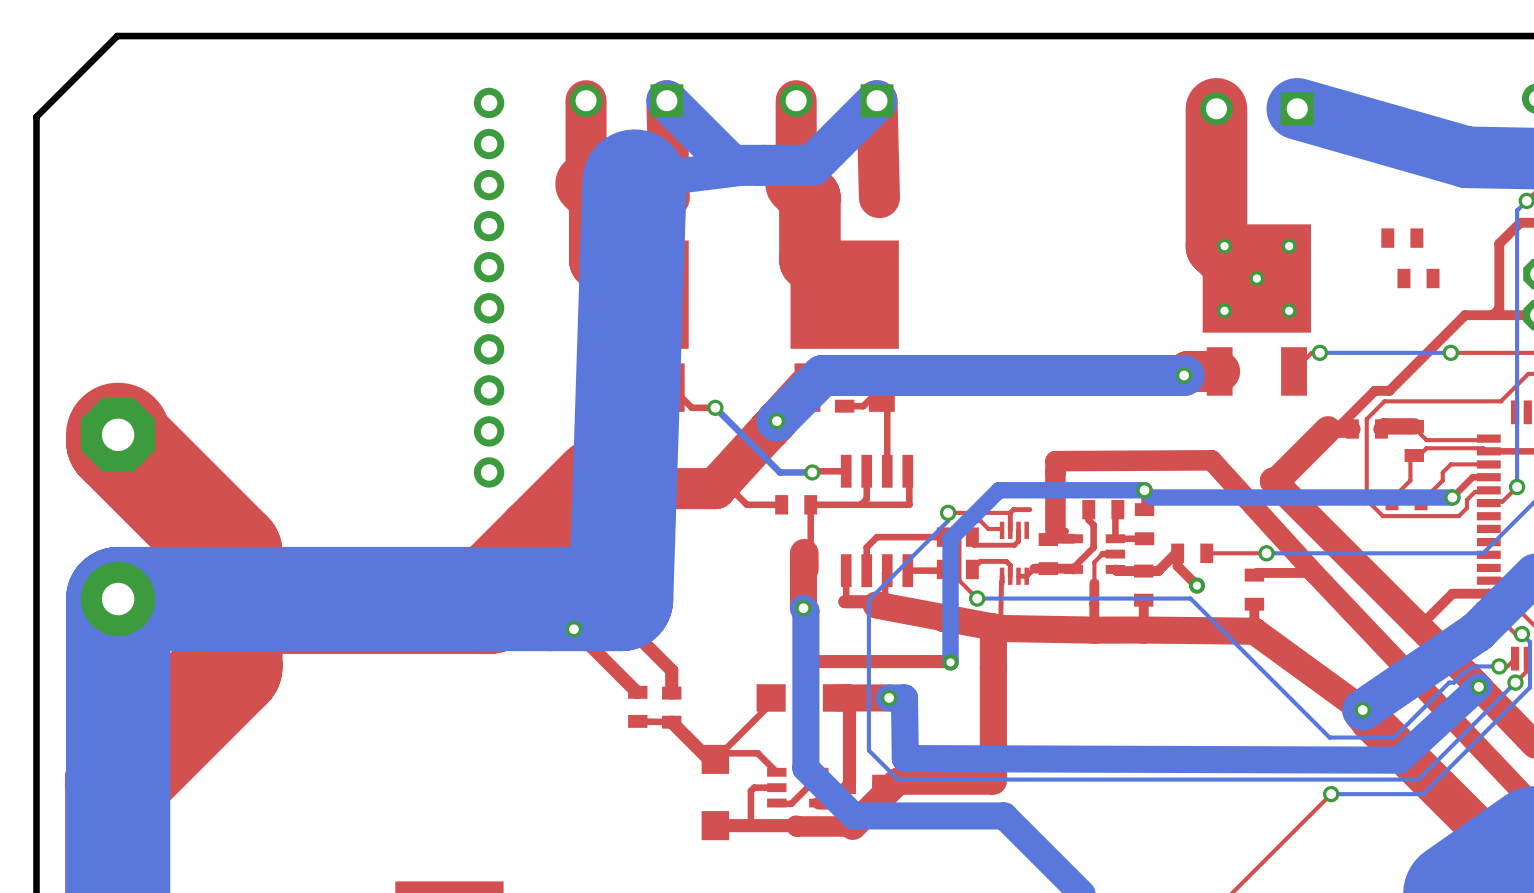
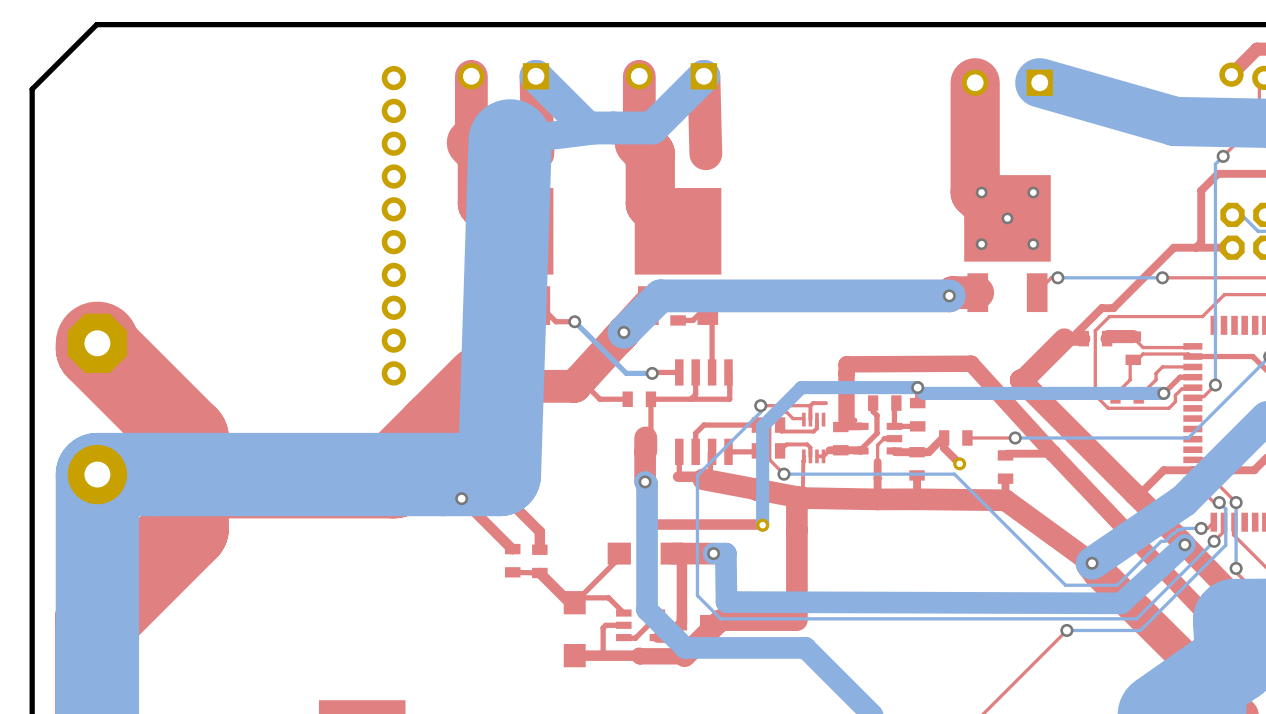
part: (1402, 238) -> none
part: (1418, 278) -> none

